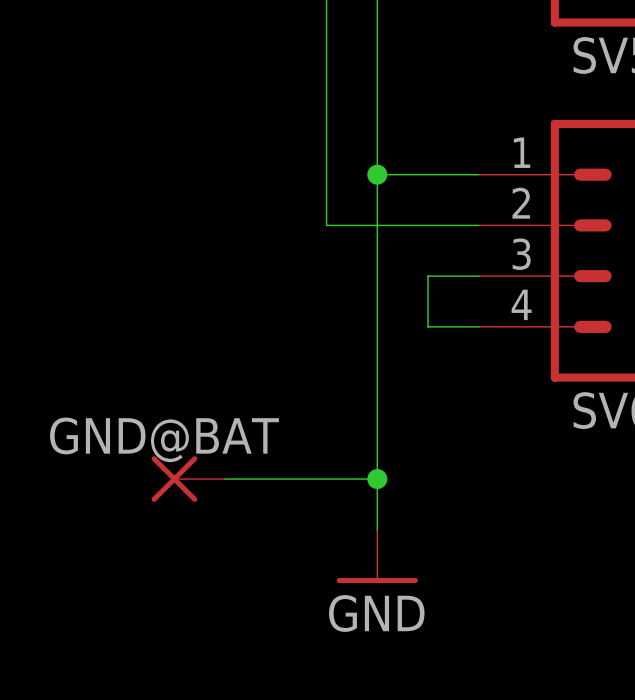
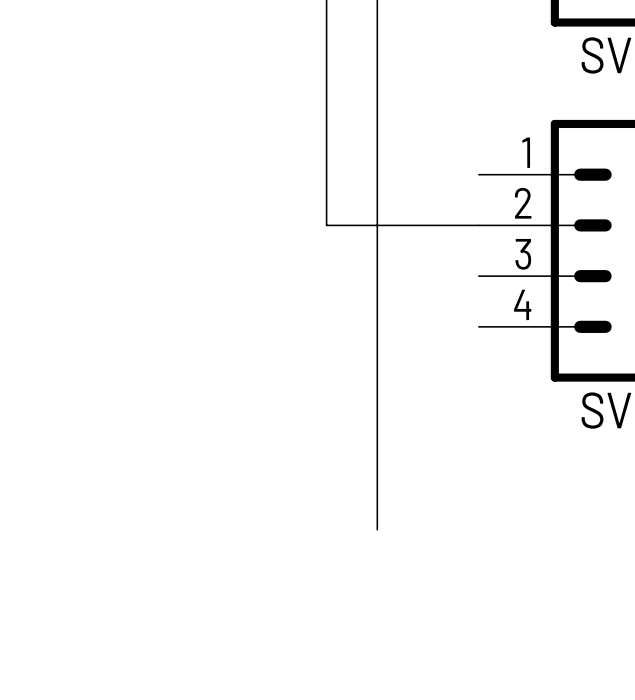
wire: (377, 174) (478, 174) -> none
junction: (377, 174) -> none
wire: (478, 276) (428, 276) (428, 326) (478, 326) -> none
GND@BAT: (188, 479) -> none
wire: (225, 479) (377, 479) -> none
junction: (377, 479) -> none
power symbol: GND (377, 556) -> none

